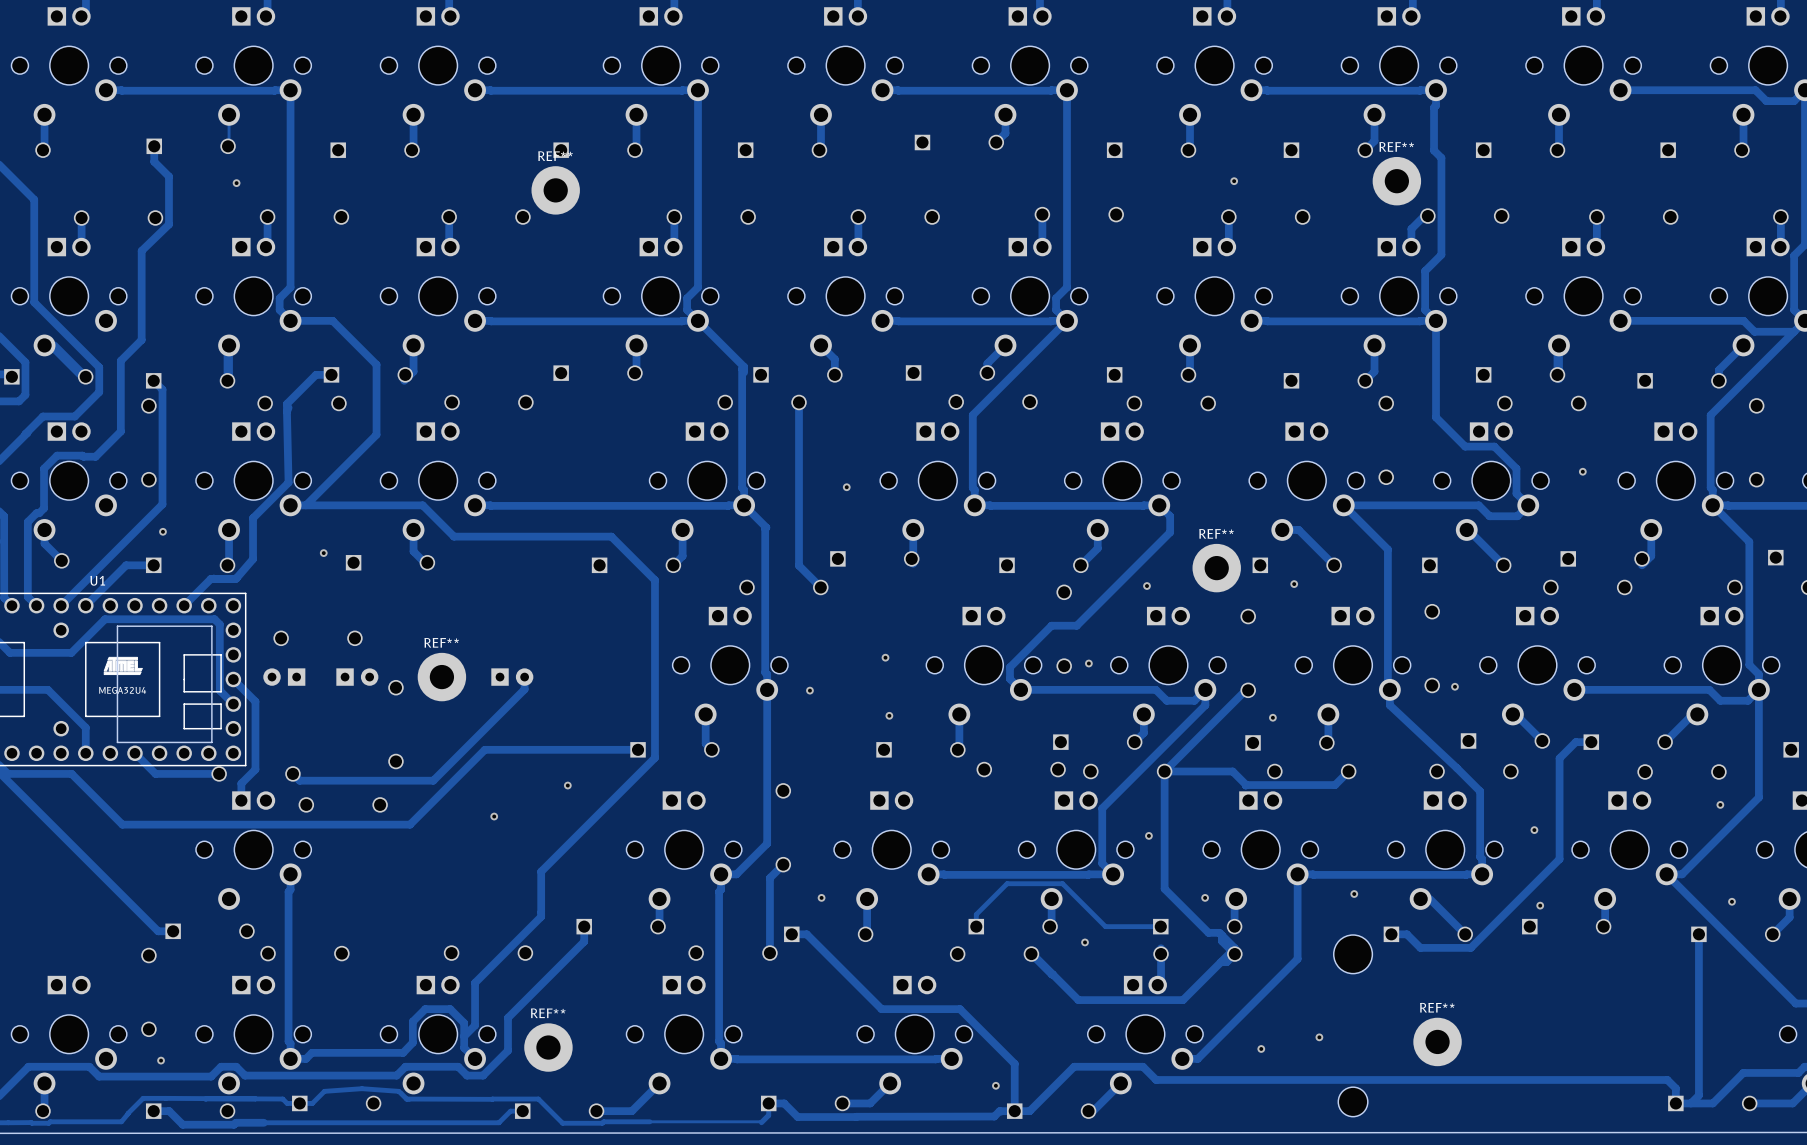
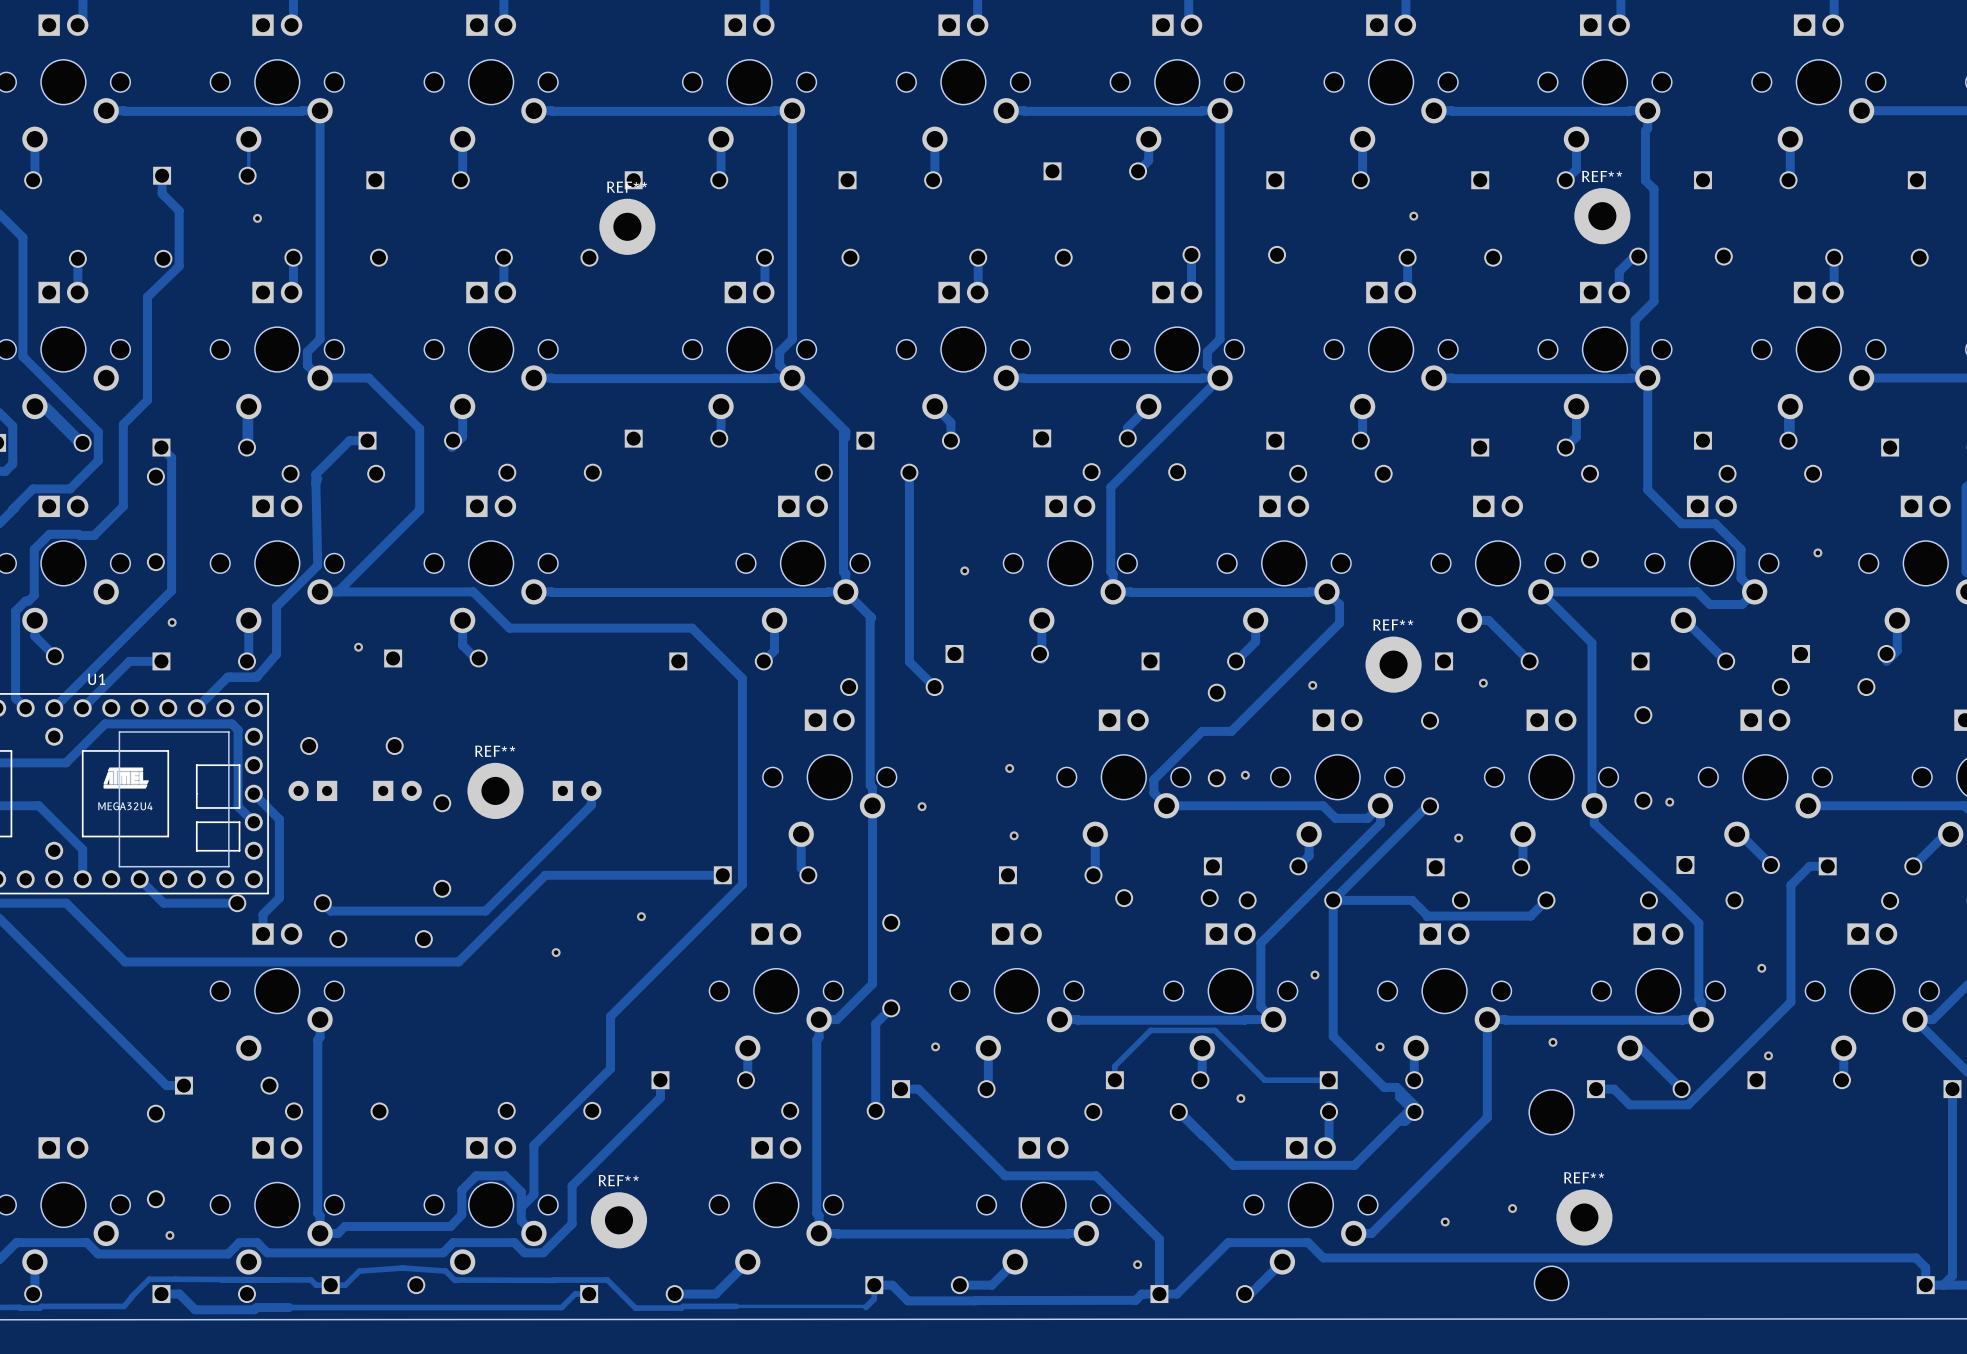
REF** position: (1437, 1041) -> (1584, 1217)

